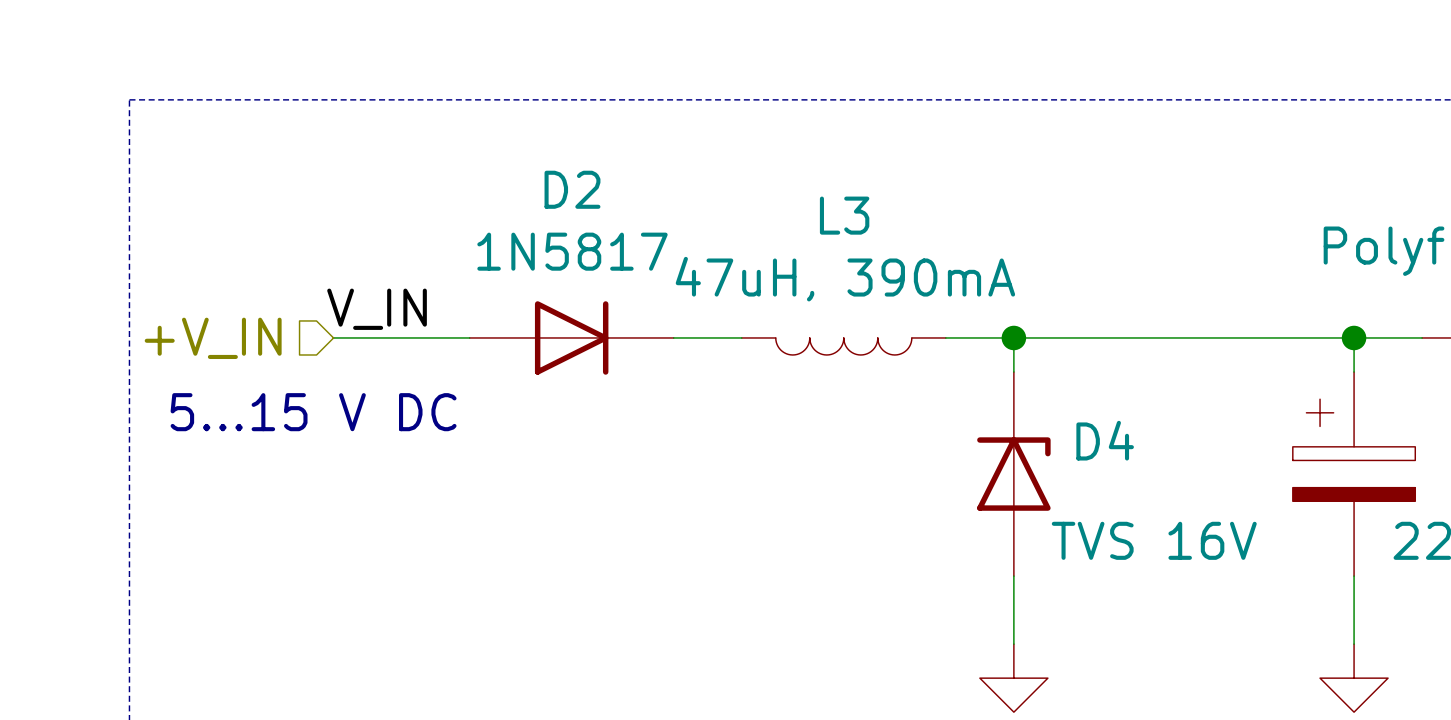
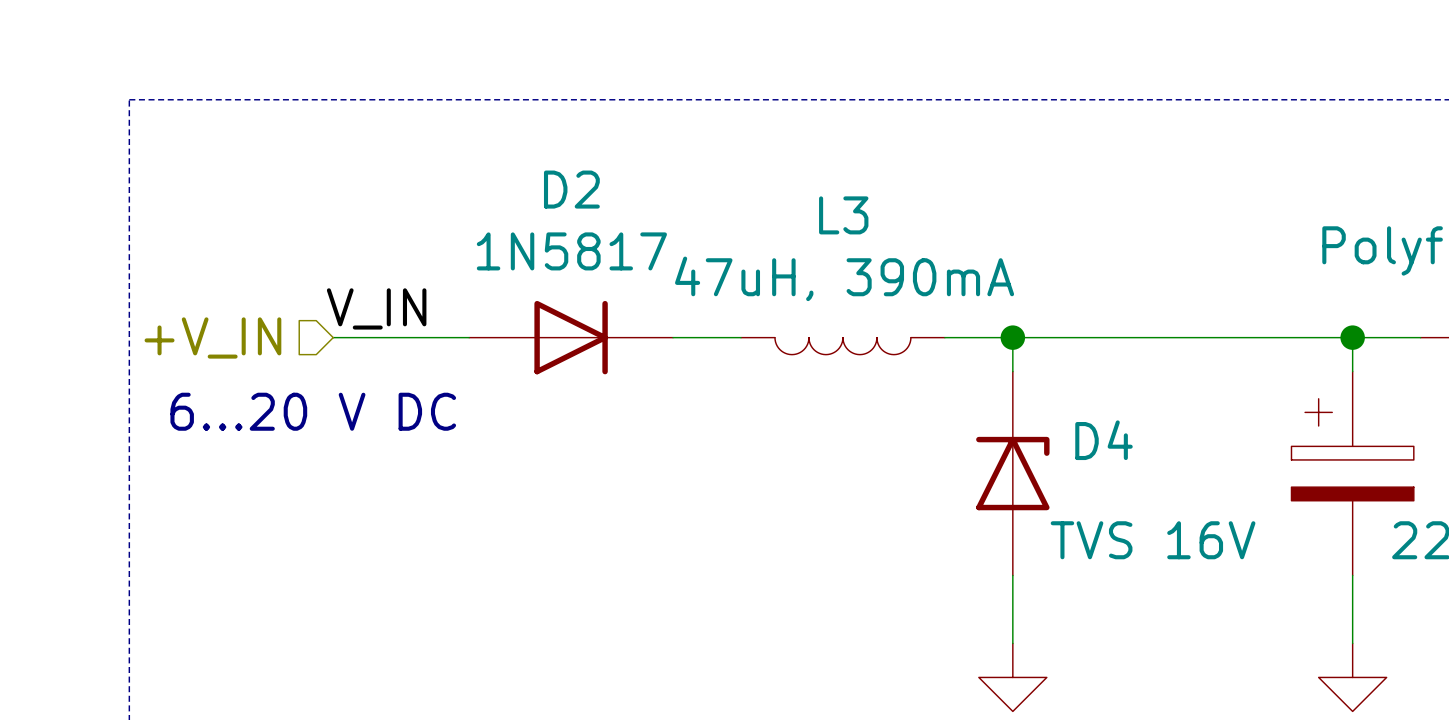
text: 5...15 V DC (313, 412) -> 6...20 V DC (313, 411)

